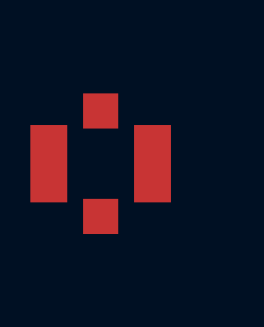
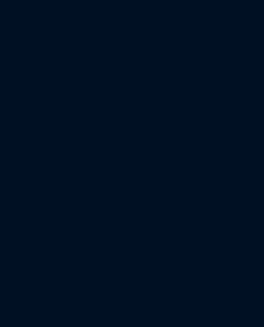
part: (100, 163) -> none

